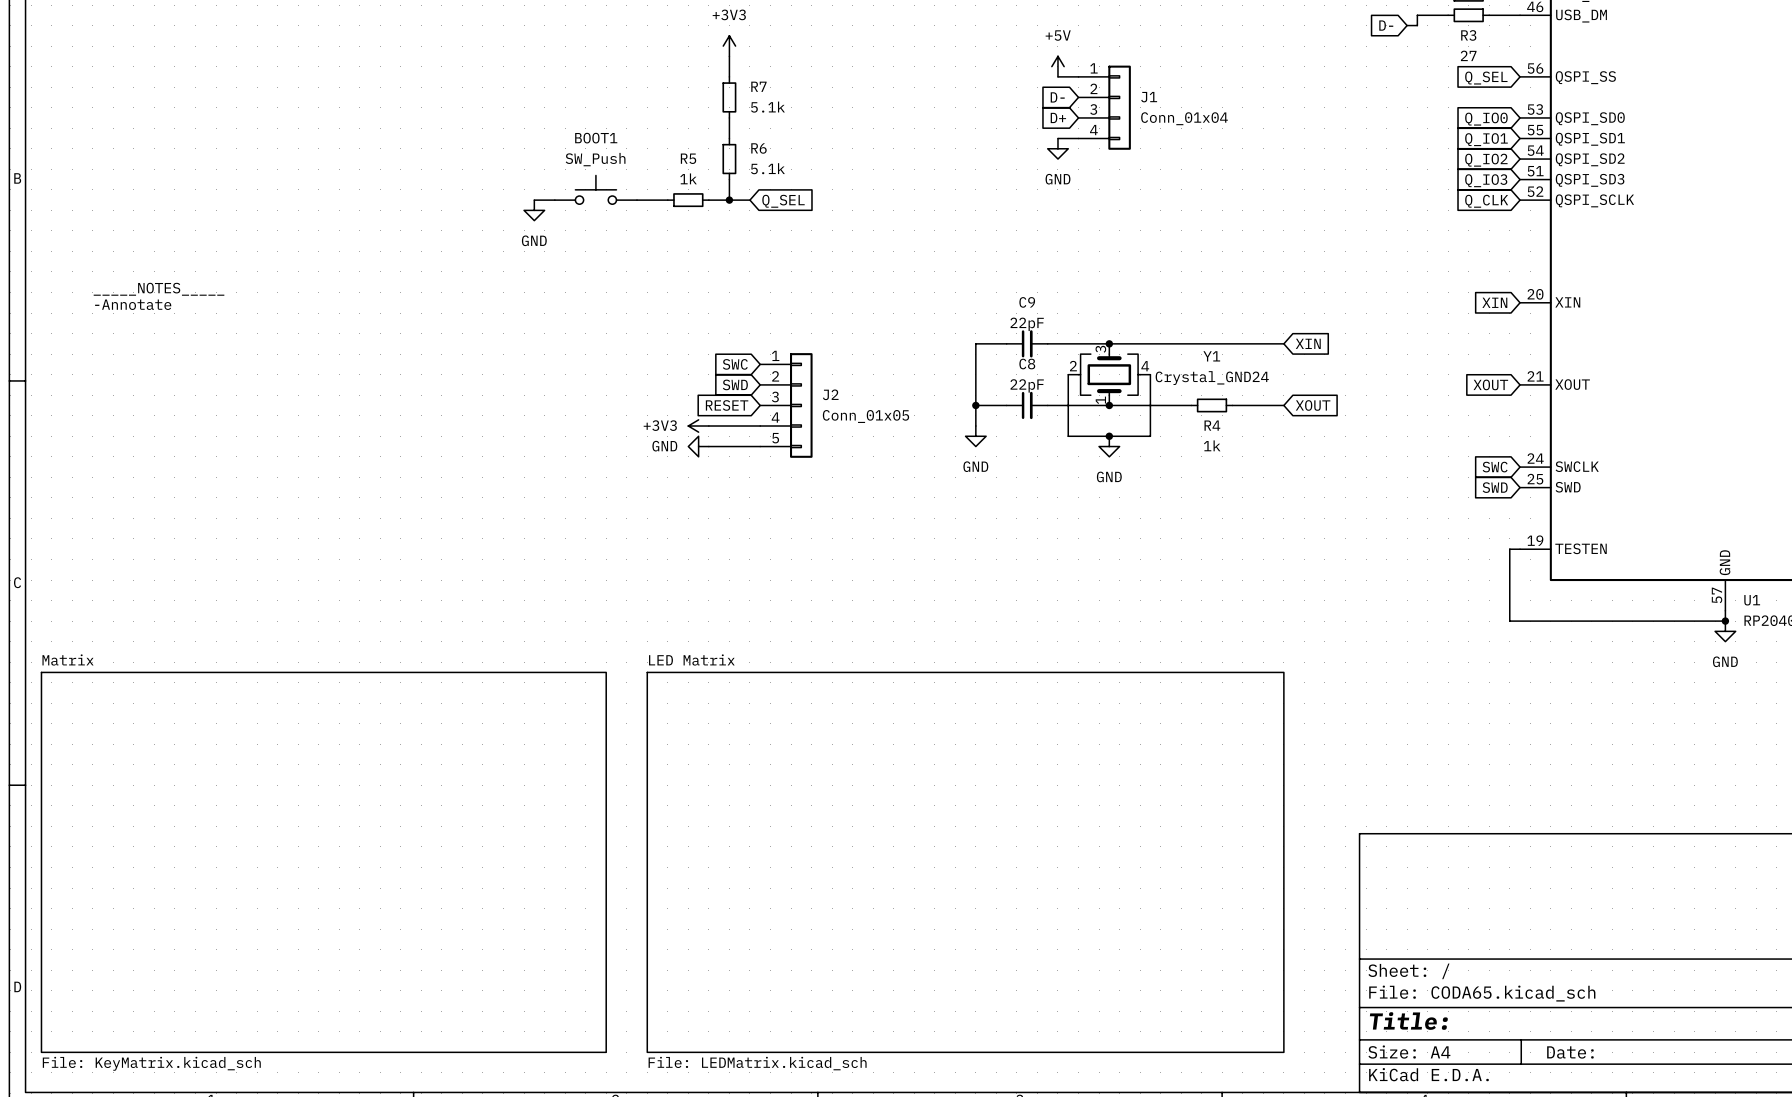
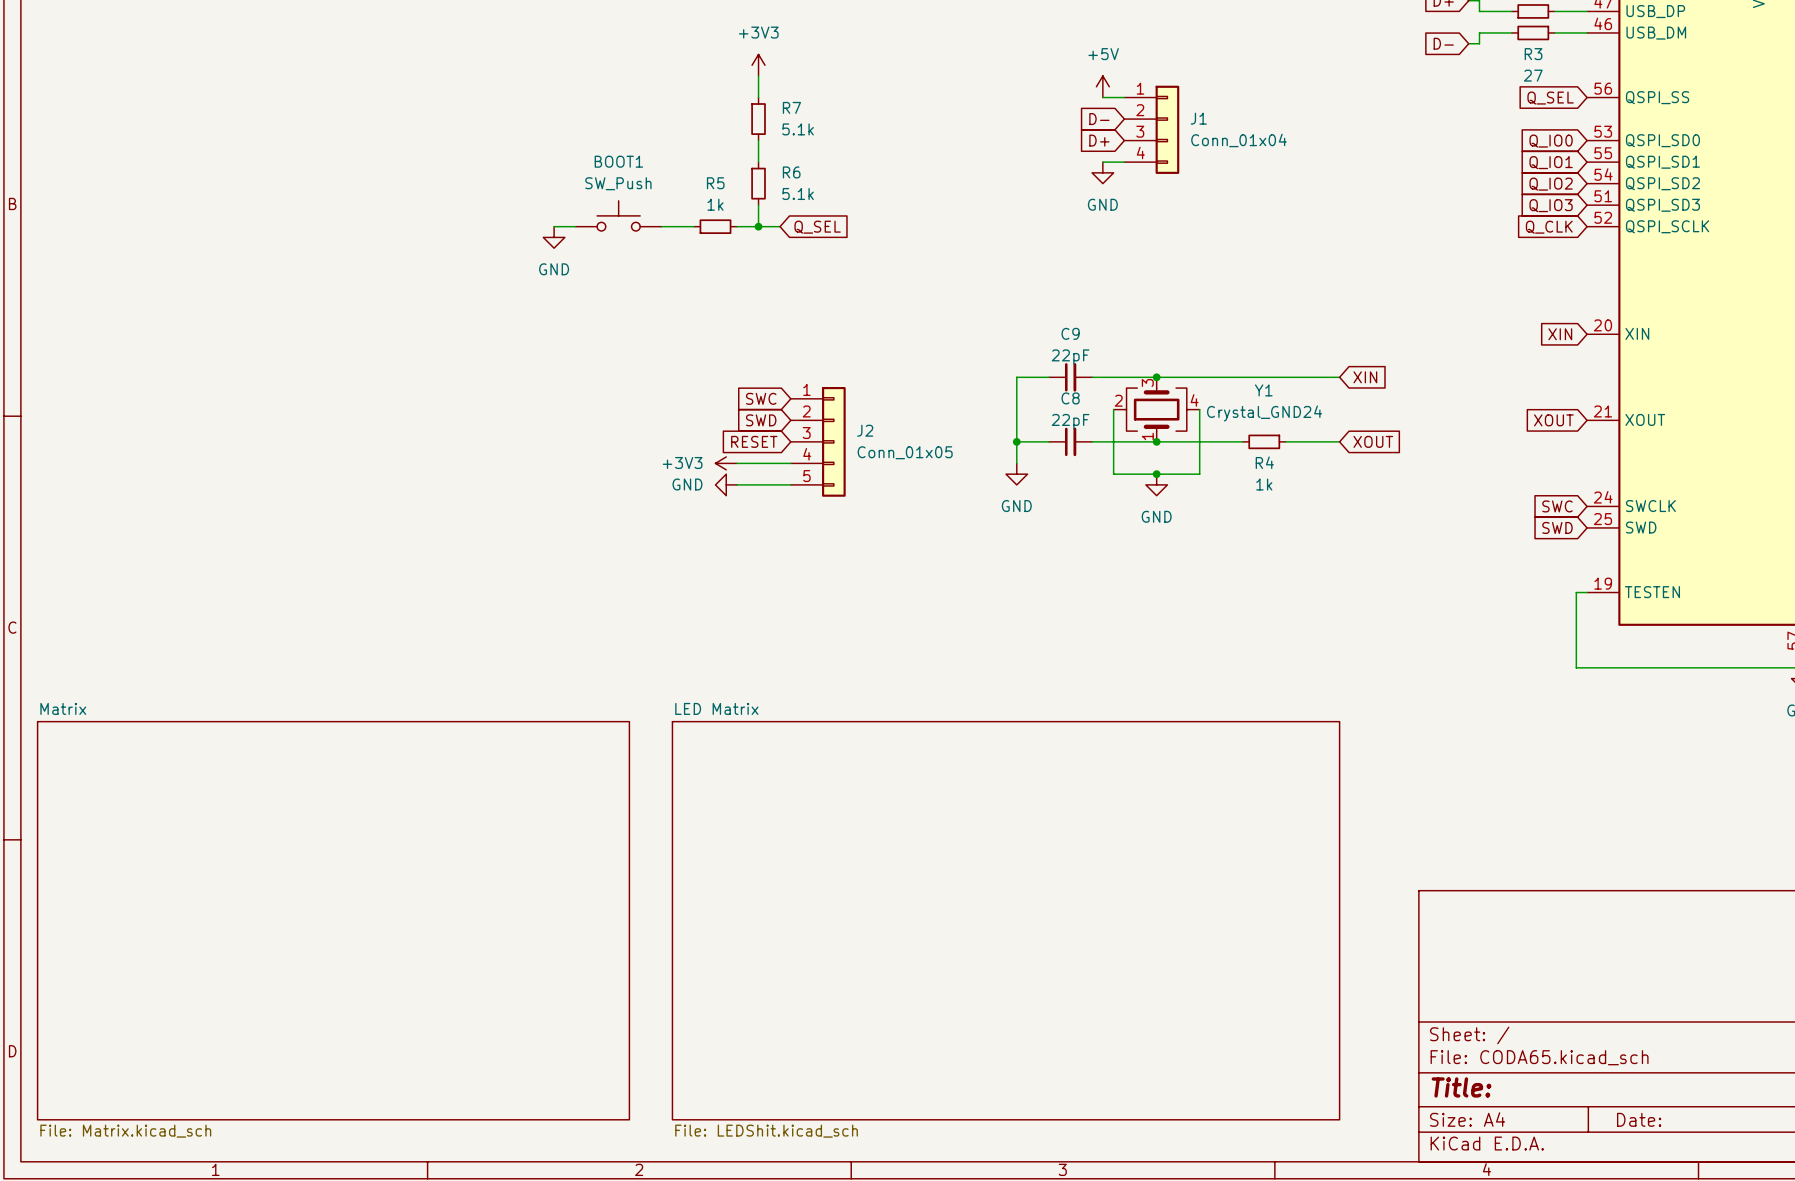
text: _____NOTES_____ (159, 289) -> none
text: -Annotate (133, 304) -> none
sheet Matrix value: File: KeyMatrix.kicad_sch (151, 1063) -> File: Matrix.kicad_sch (125, 1131)
sheet LED Matrix value: File: LEDMatrix.kicad_sch (757, 1063) -> File: LEDShit.kicad_sch (766, 1131)

